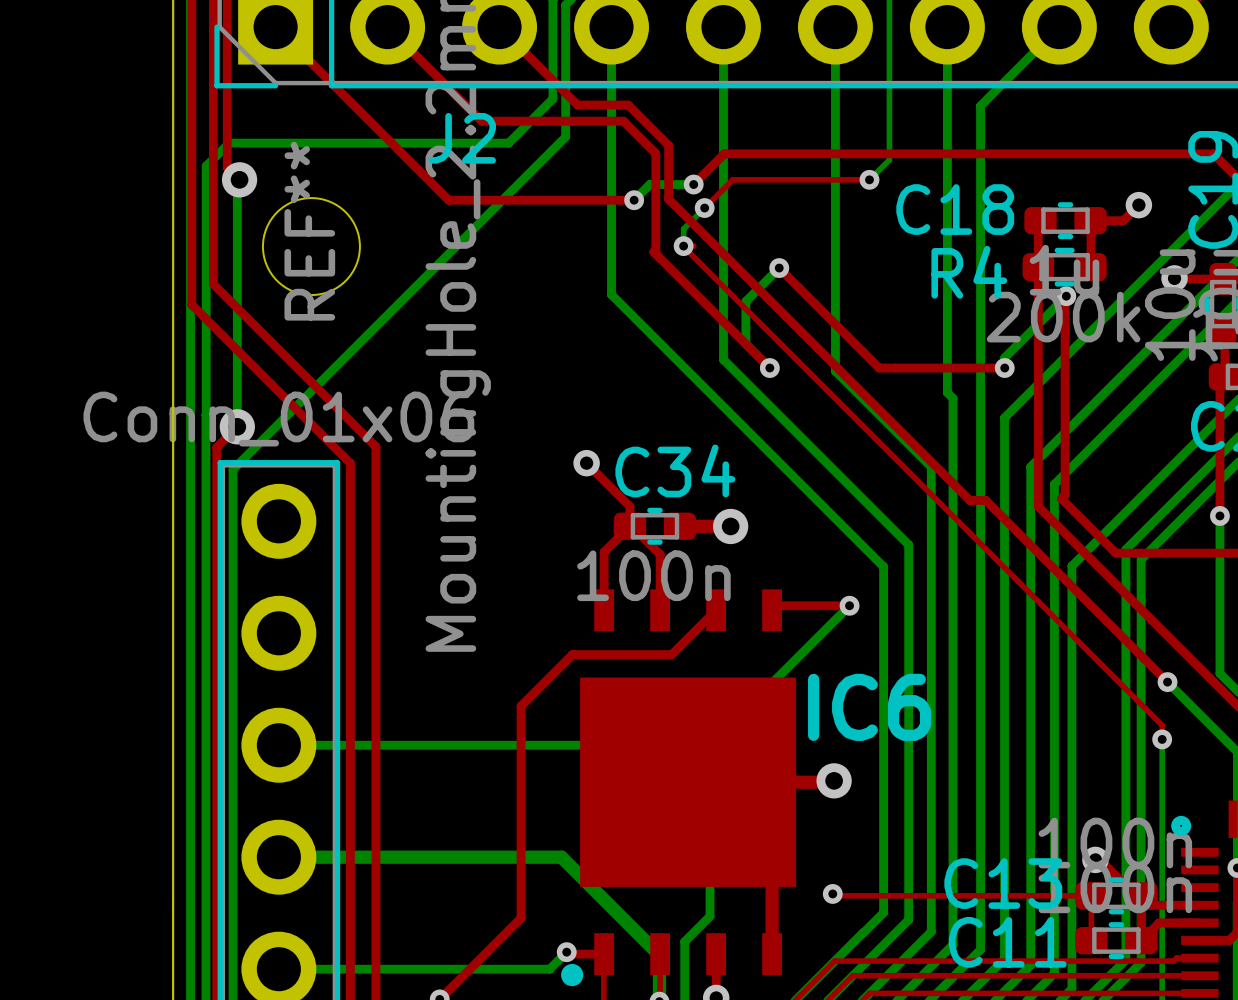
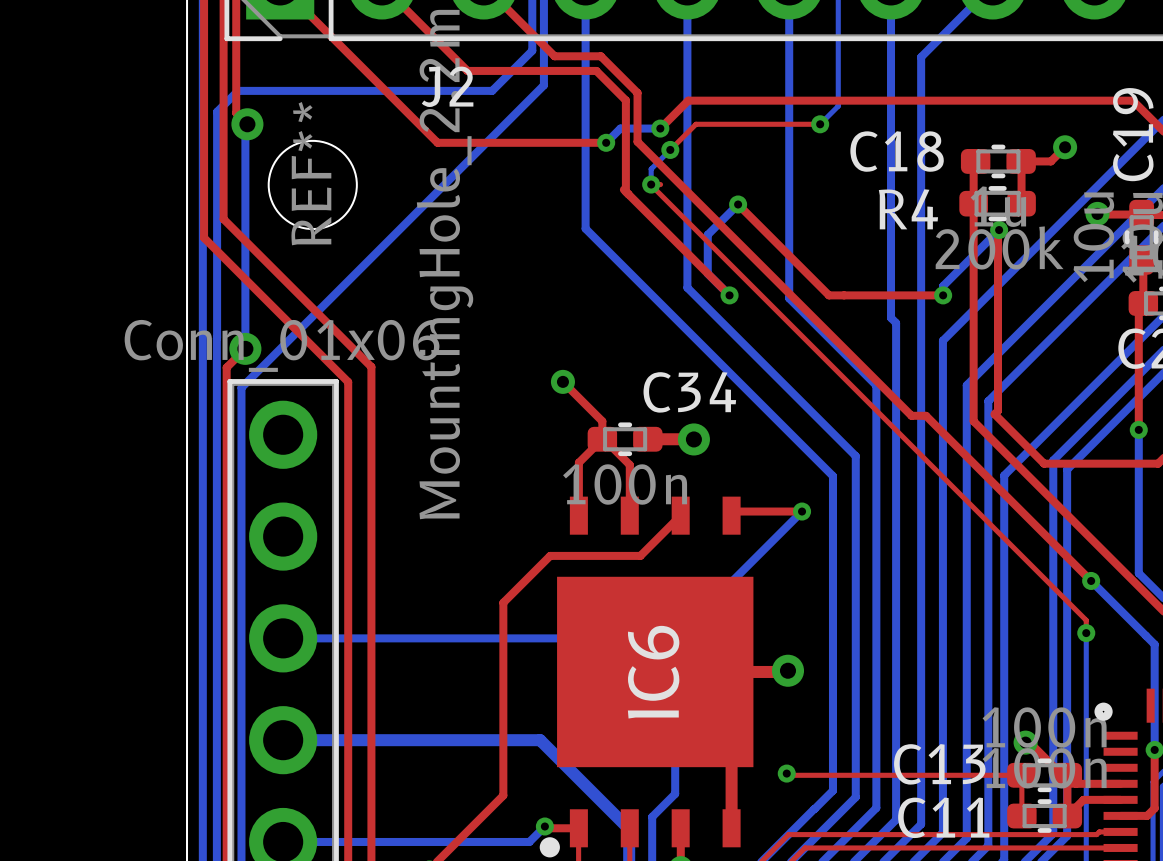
C34 name position: C34 (675, 470) -> C34 (689, 392)
IC6 name rotation: 0° (869, 707) -> 90° counterclockwise (653, 672)
IC6 name position: IC6 (869, 707) -> IC6 (653, 672)

